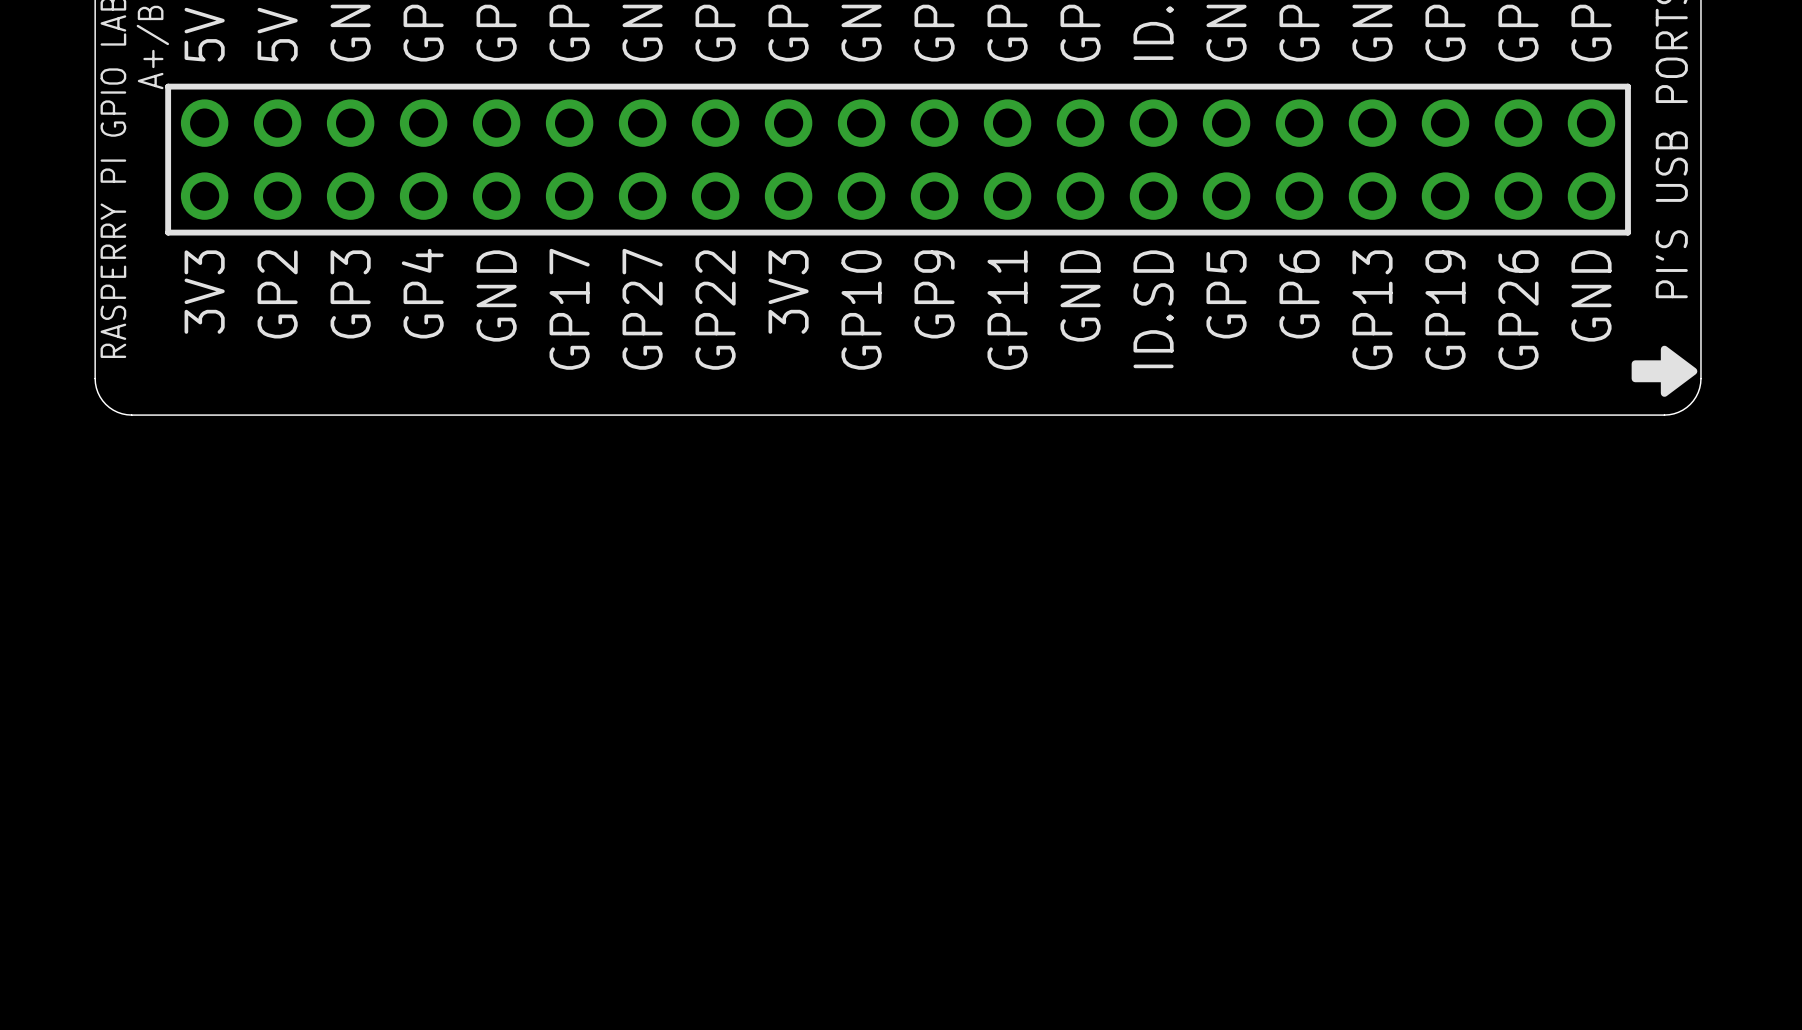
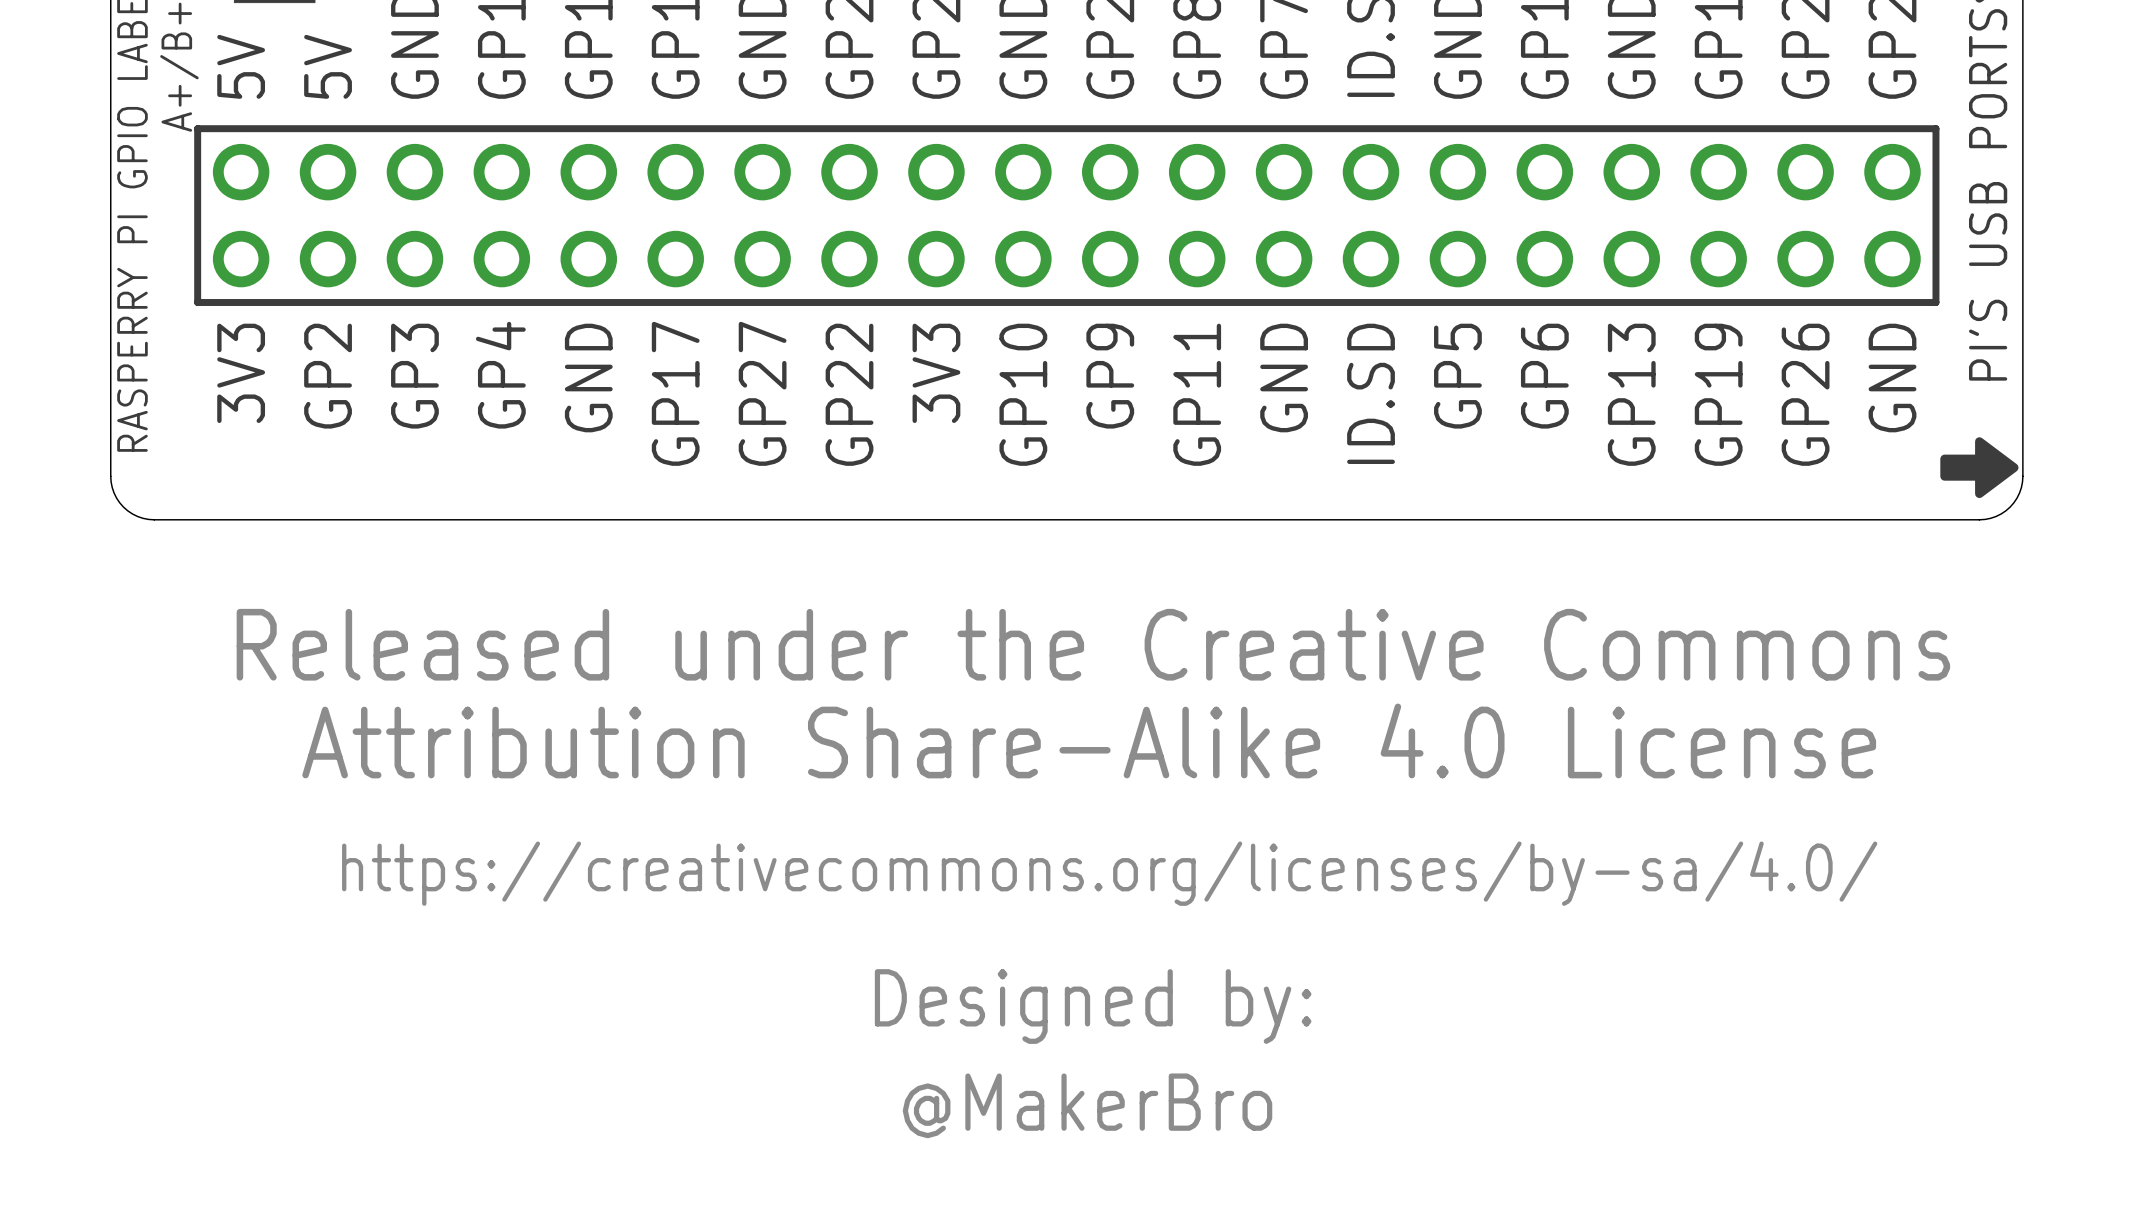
drawing: none -> [236, 608, 1951, 1044]
text: none -> @MakerBro (1087, 1105)

